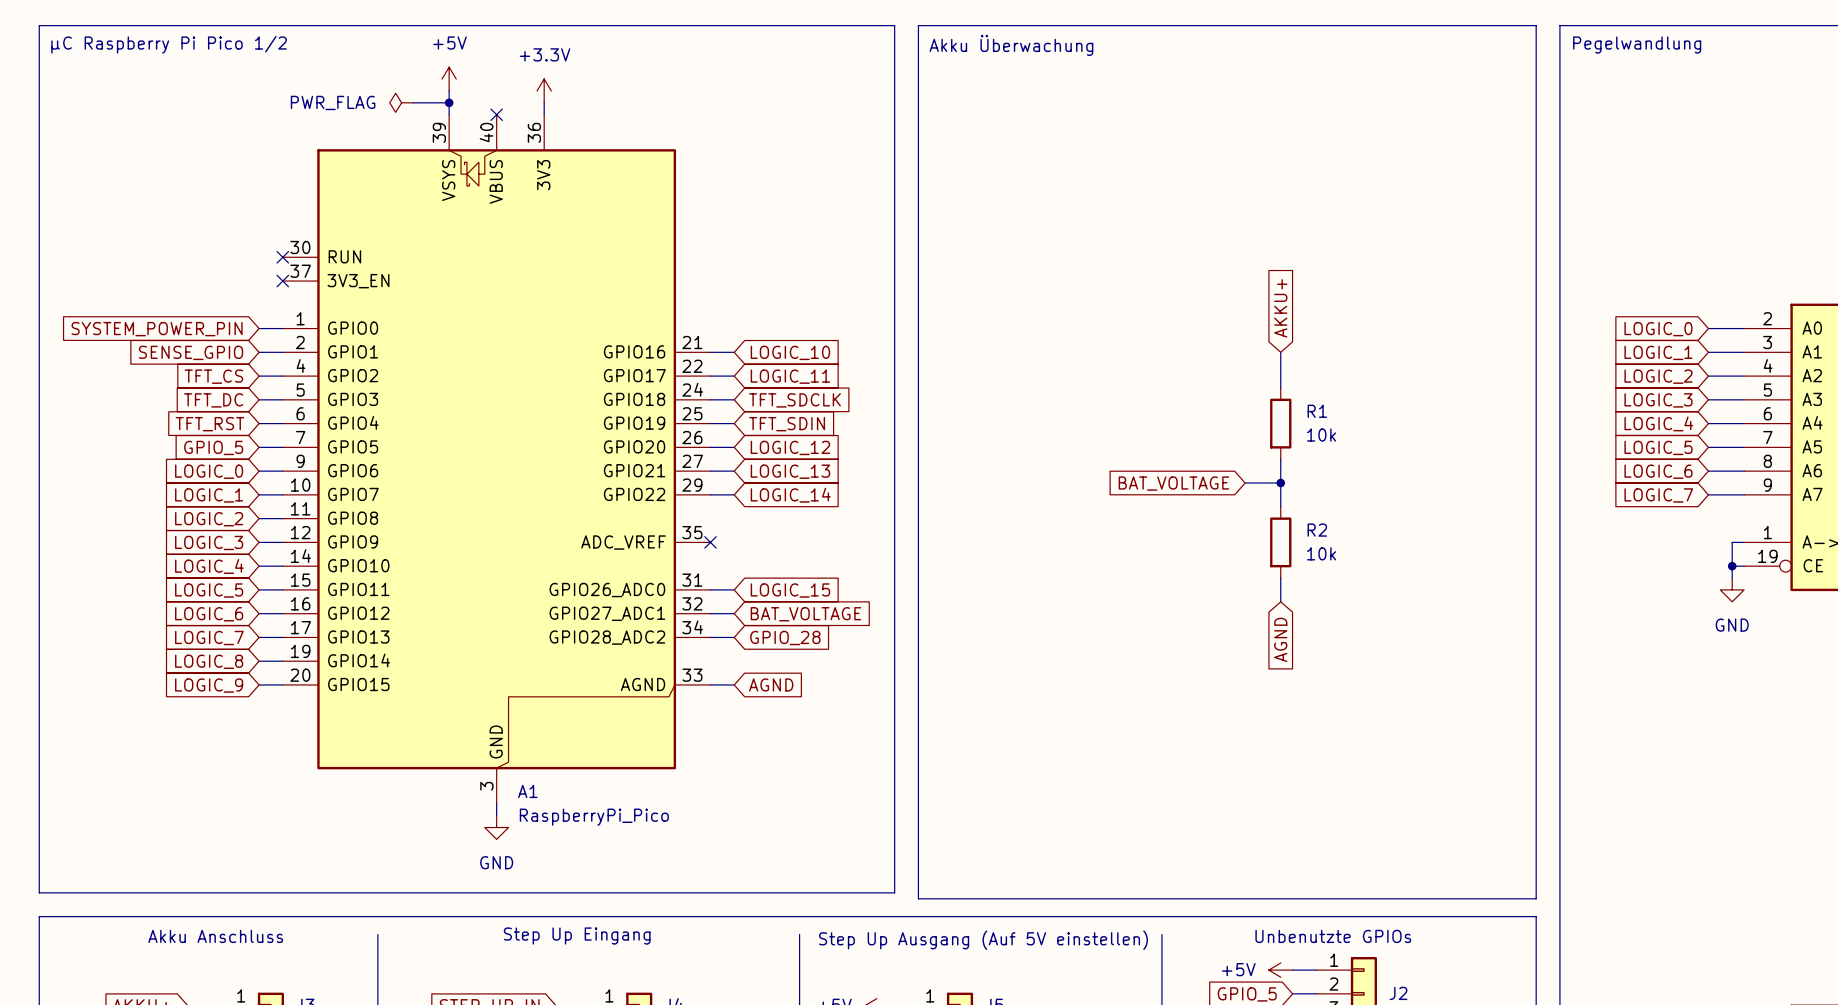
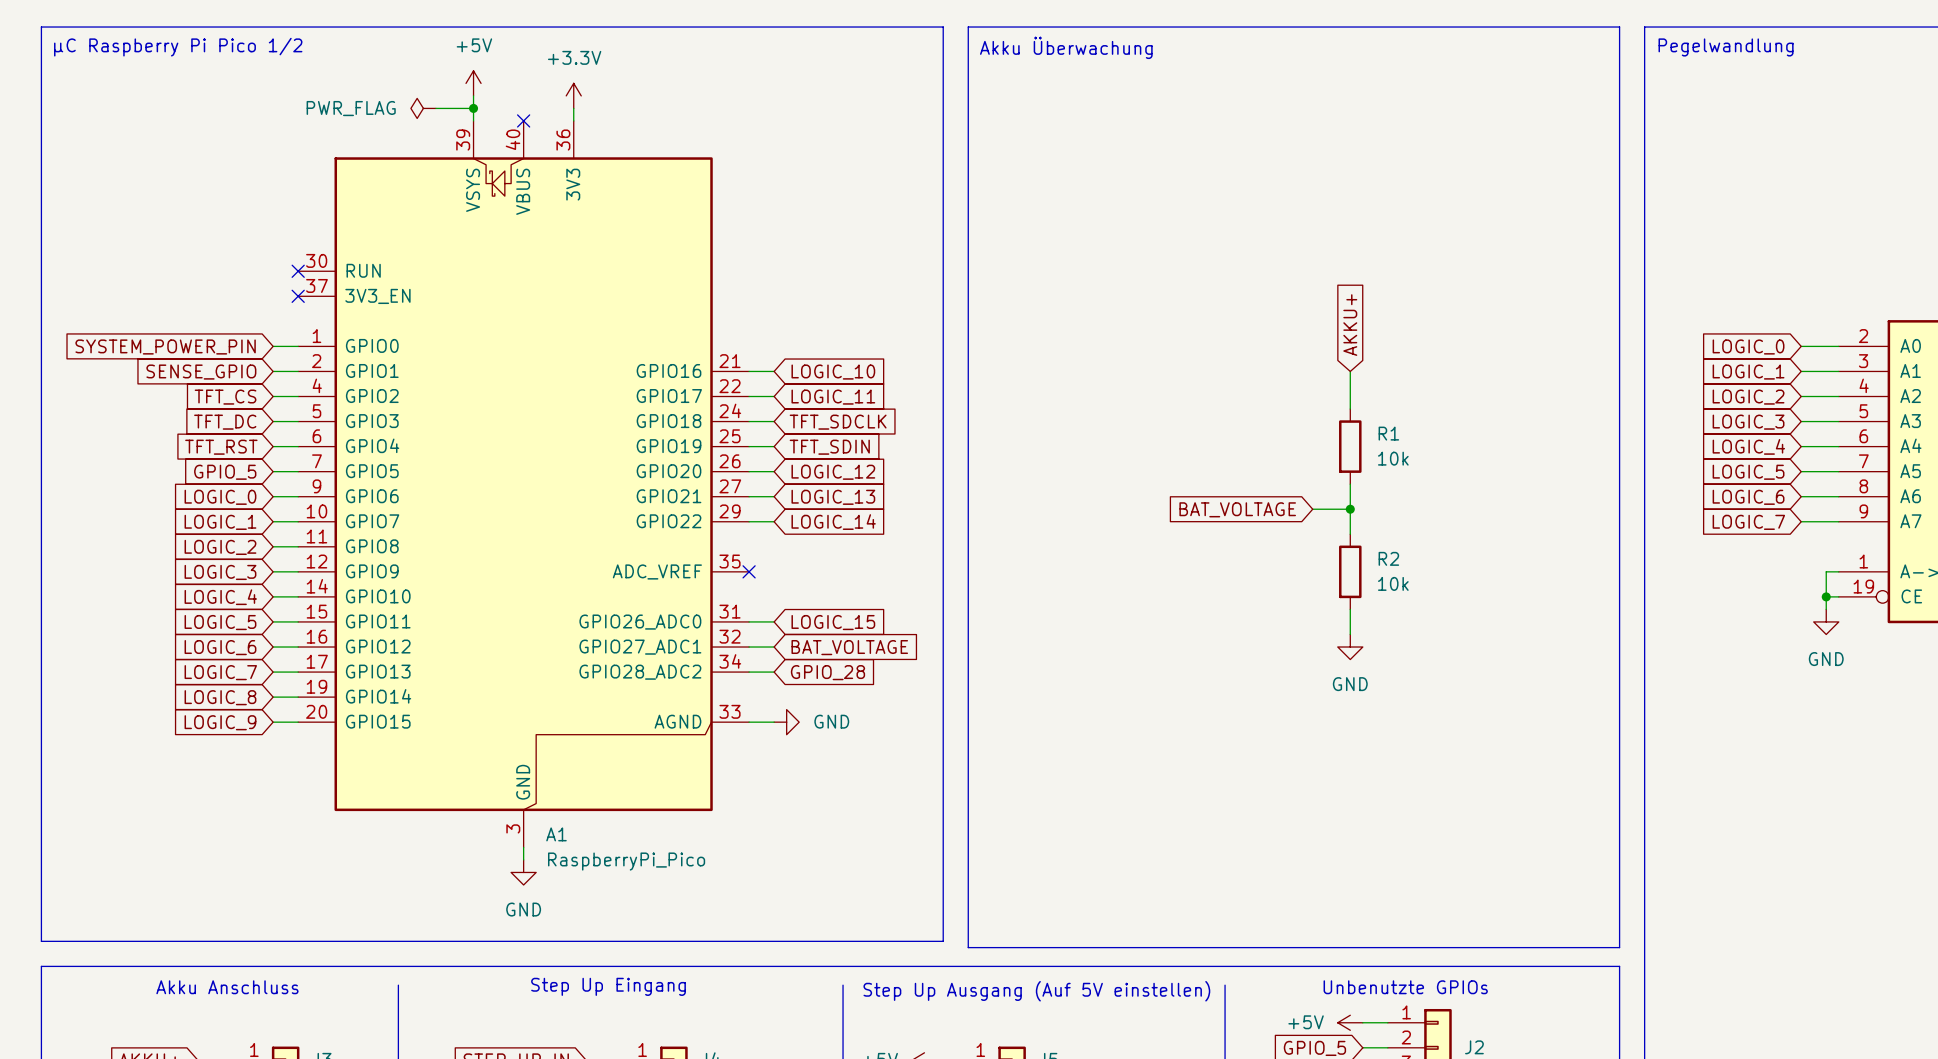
power symbol: none -> GND (1350, 647)
global label: AGND (1280, 639) -> none
power symbol: none -> GND (786, 722)
global label: AGND (771, 684) -> none

